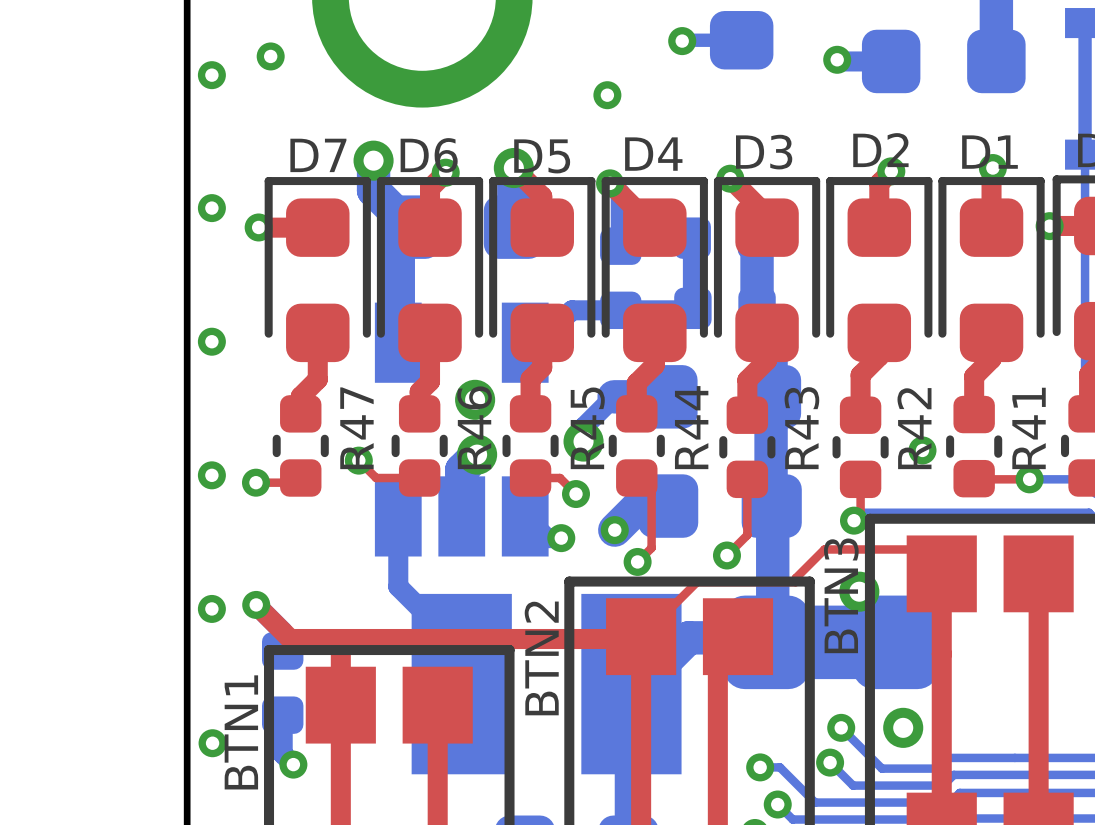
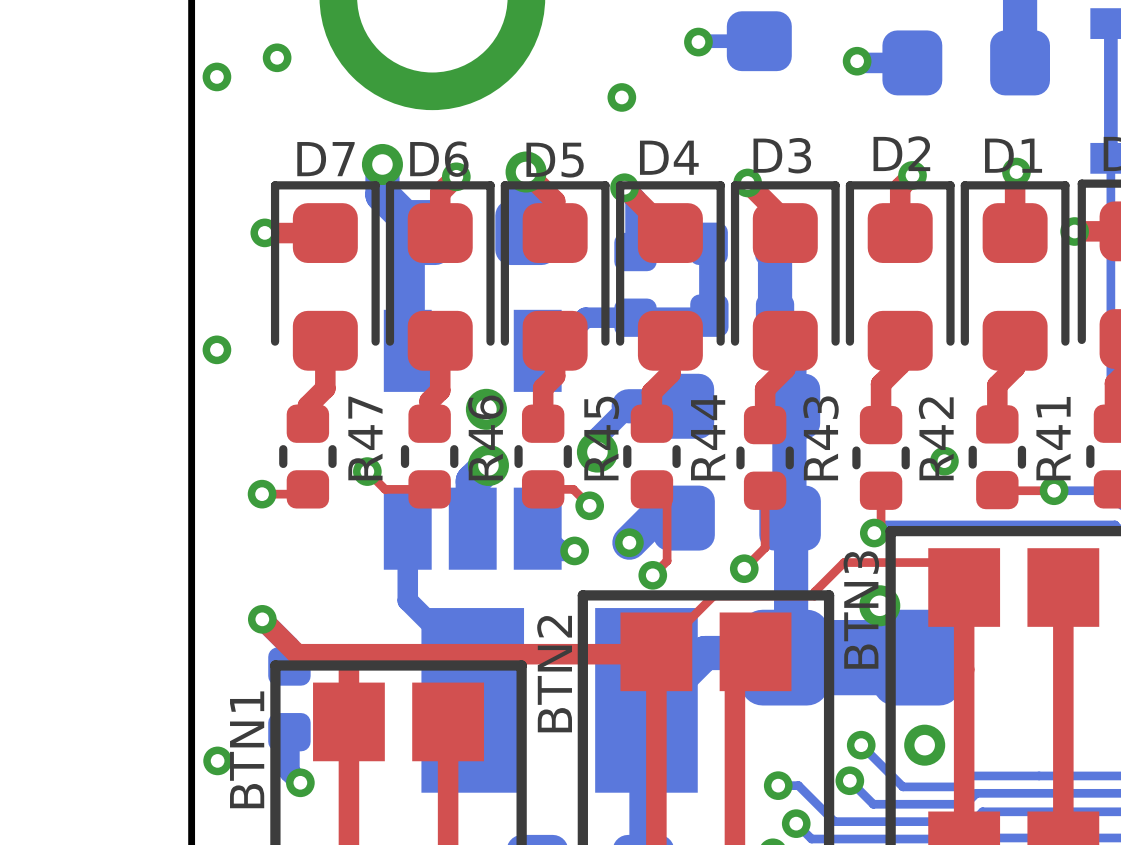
via: (211, 208) -> none
via: (211, 475) -> none
via: (211, 608) -> none

